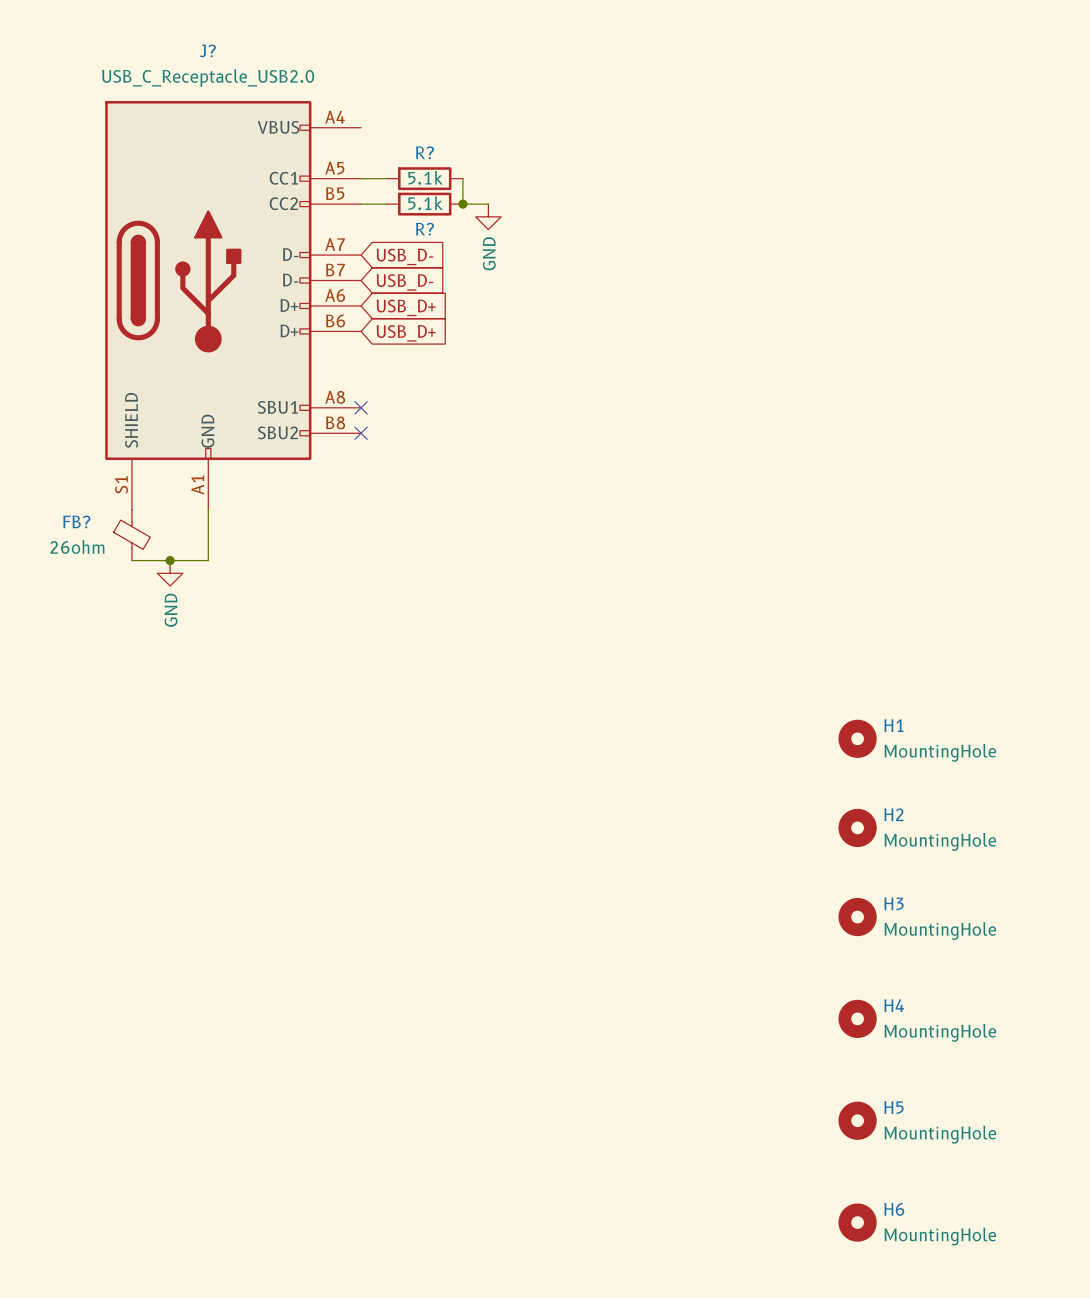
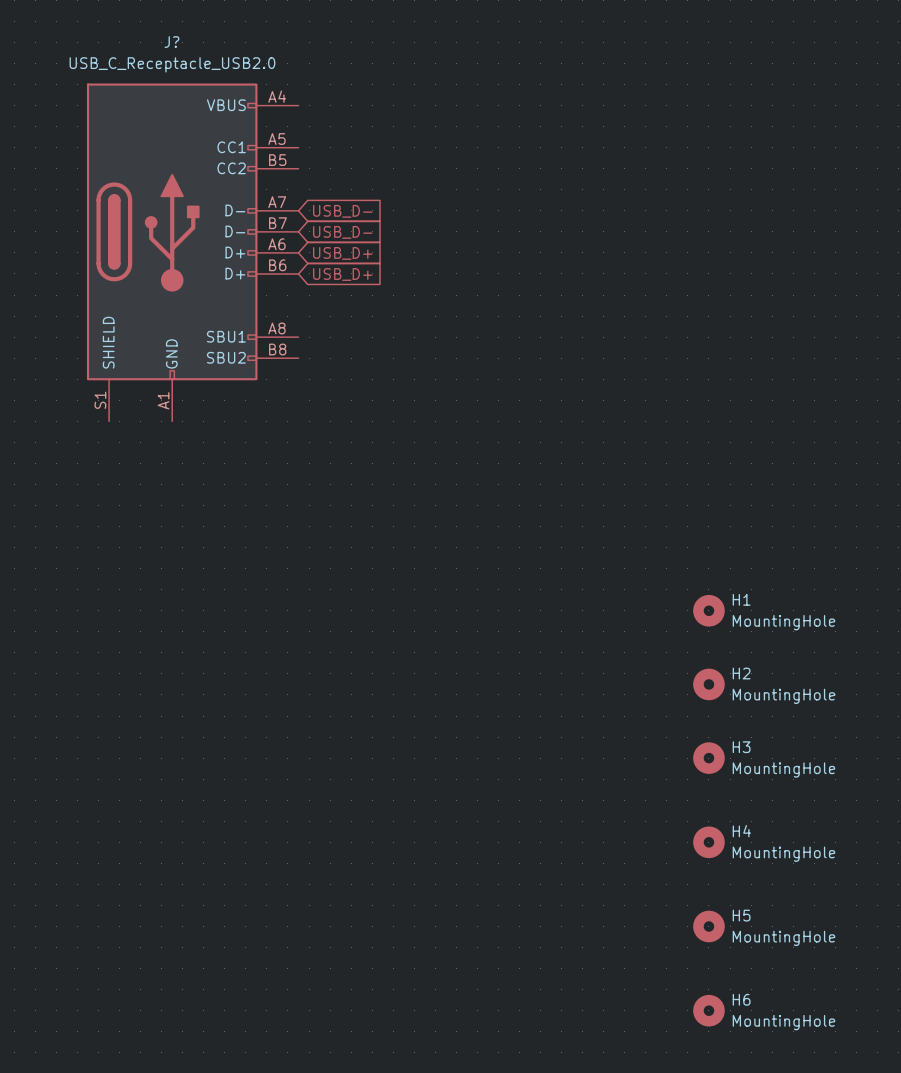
wire: (361, 178) (386, 178) -> none
R?: 5.1k (424, 178) -> none
wire: (462, 178) (462, 204) (488, 204) -> none
wire: (361, 204) (386, 204) -> none
R?: 5.1k (424, 204) -> none
junction: (462, 204) -> none
power symbol: GND (488, 216) -> none
no-connect mark: (361, 407) -> none
no-connect mark: (361, 433) -> none
wire: (208, 509) (208, 560) (131, 560) -> none
FB?: (131, 535) -> none
junction: (170, 560) -> none
power symbol: GND (170, 573) -> none

